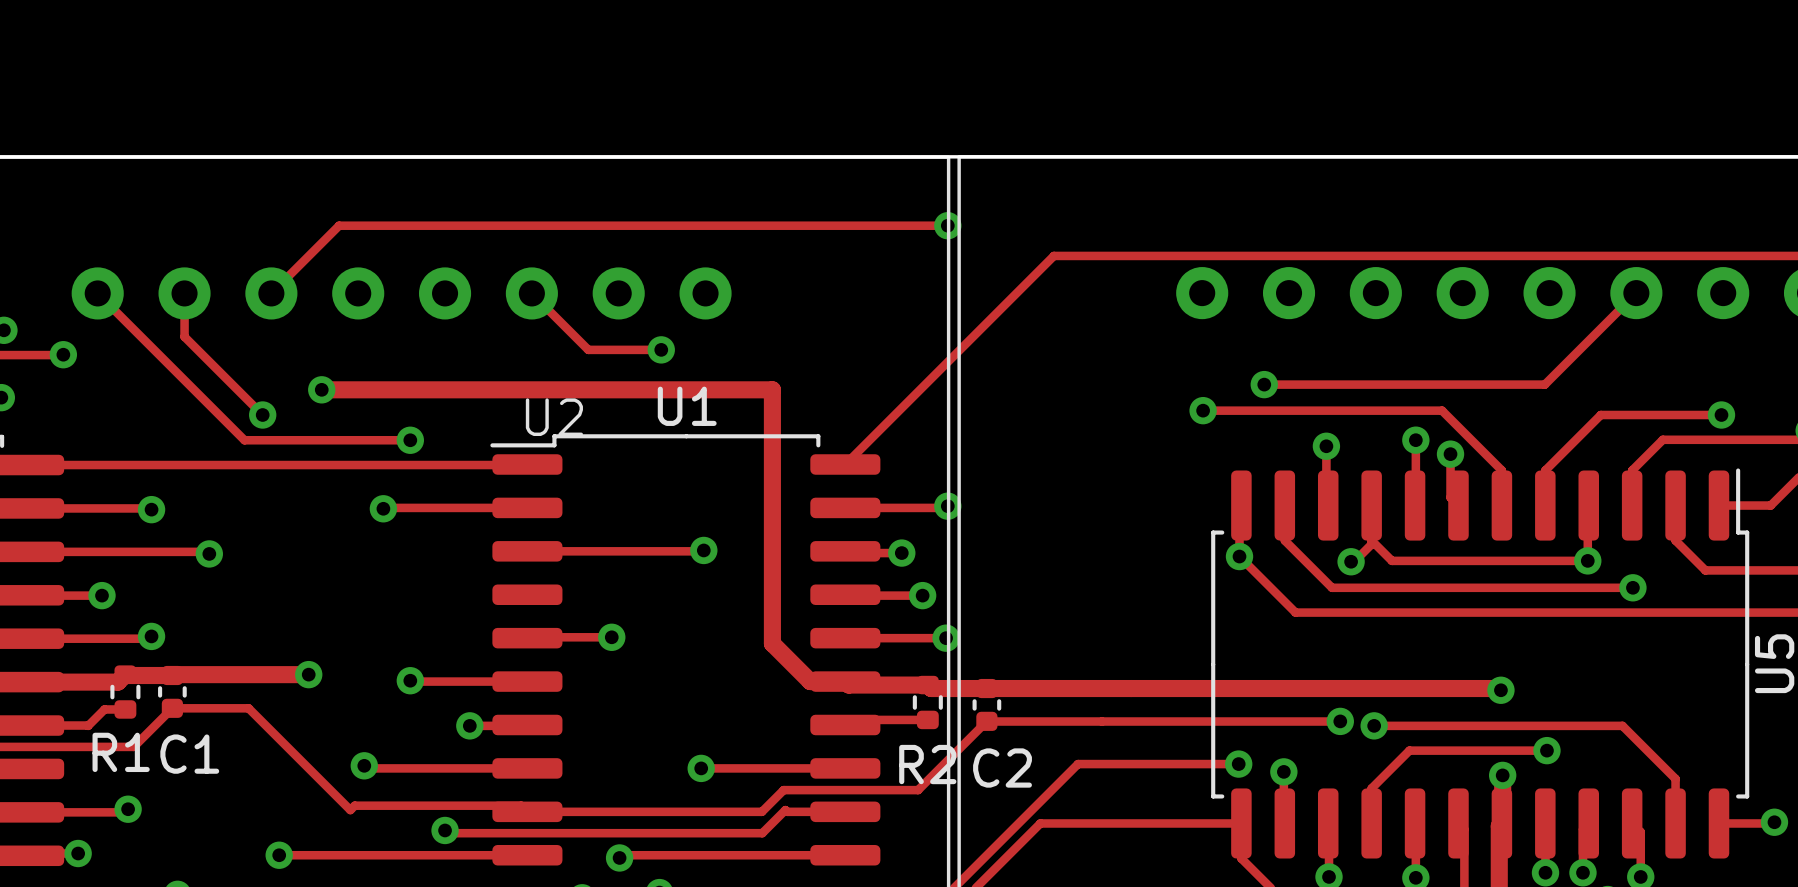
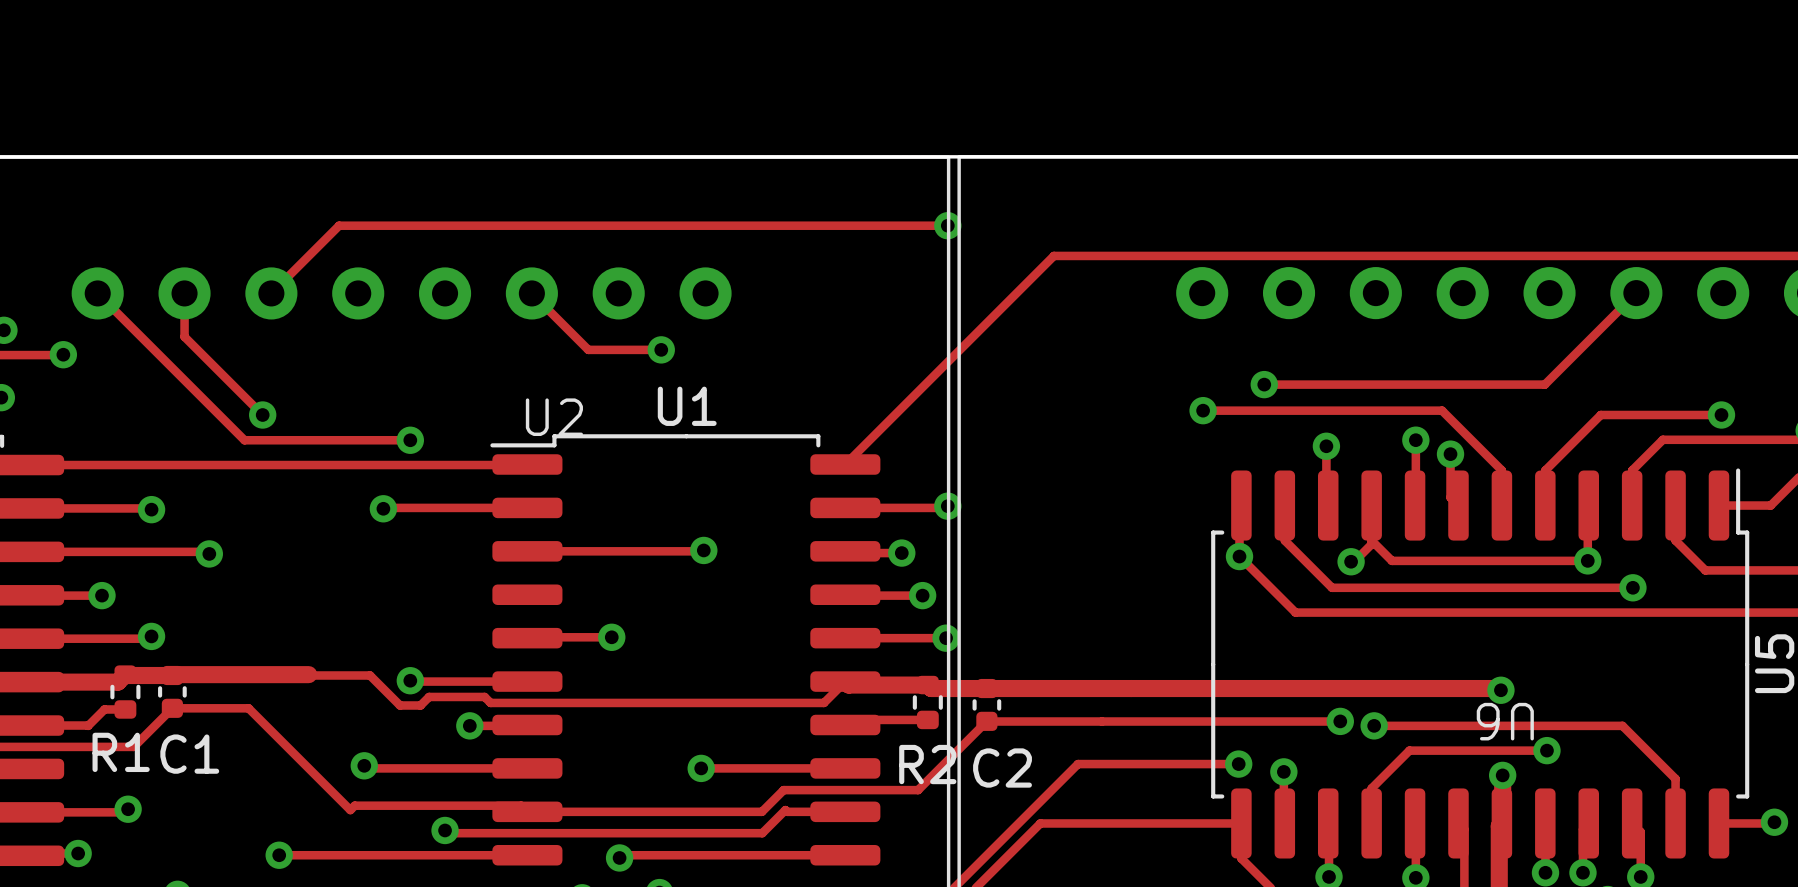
track: (321, 389) (772, 389) (772, 643) (810, 681) (845, 681) -> (172, 675) (370, 675) (400, 705) (420, 705) (429, 696) (484, 696) (490, 702) (823, 702) (845, 681)
via: (321, 389) -> none
via: (308, 674) -> none
U6 name: none -> U6 (1505, 721)

